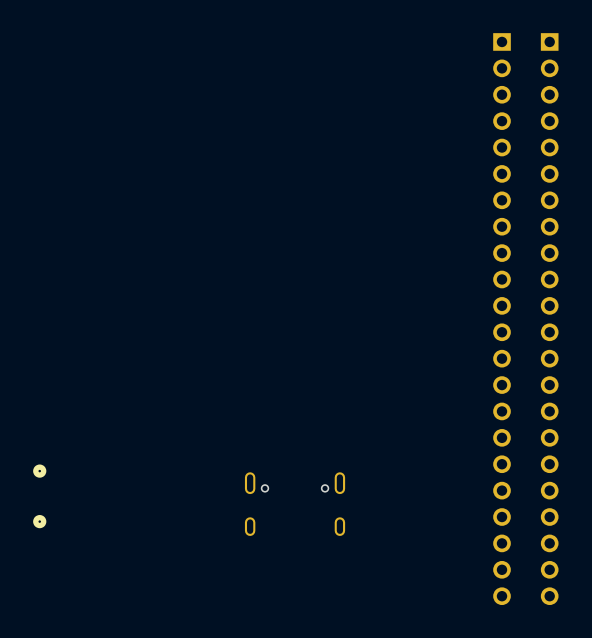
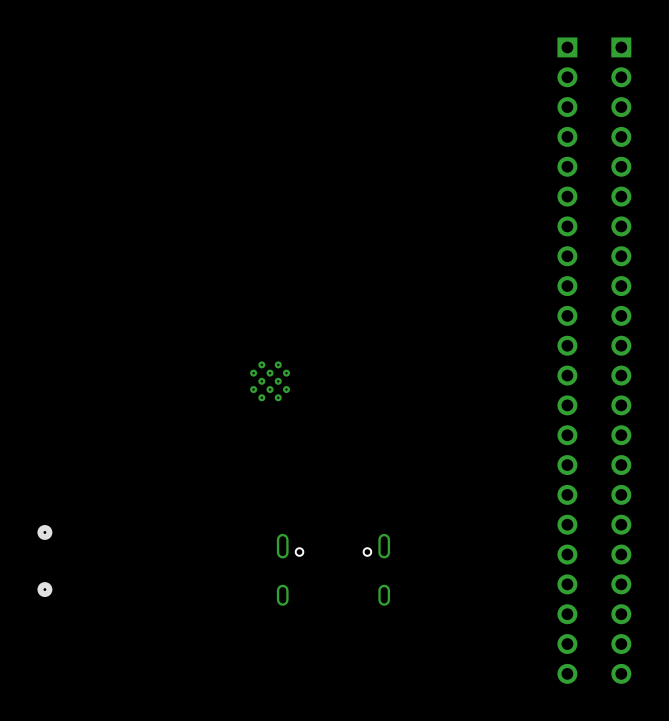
part: none -> (270, 381)

